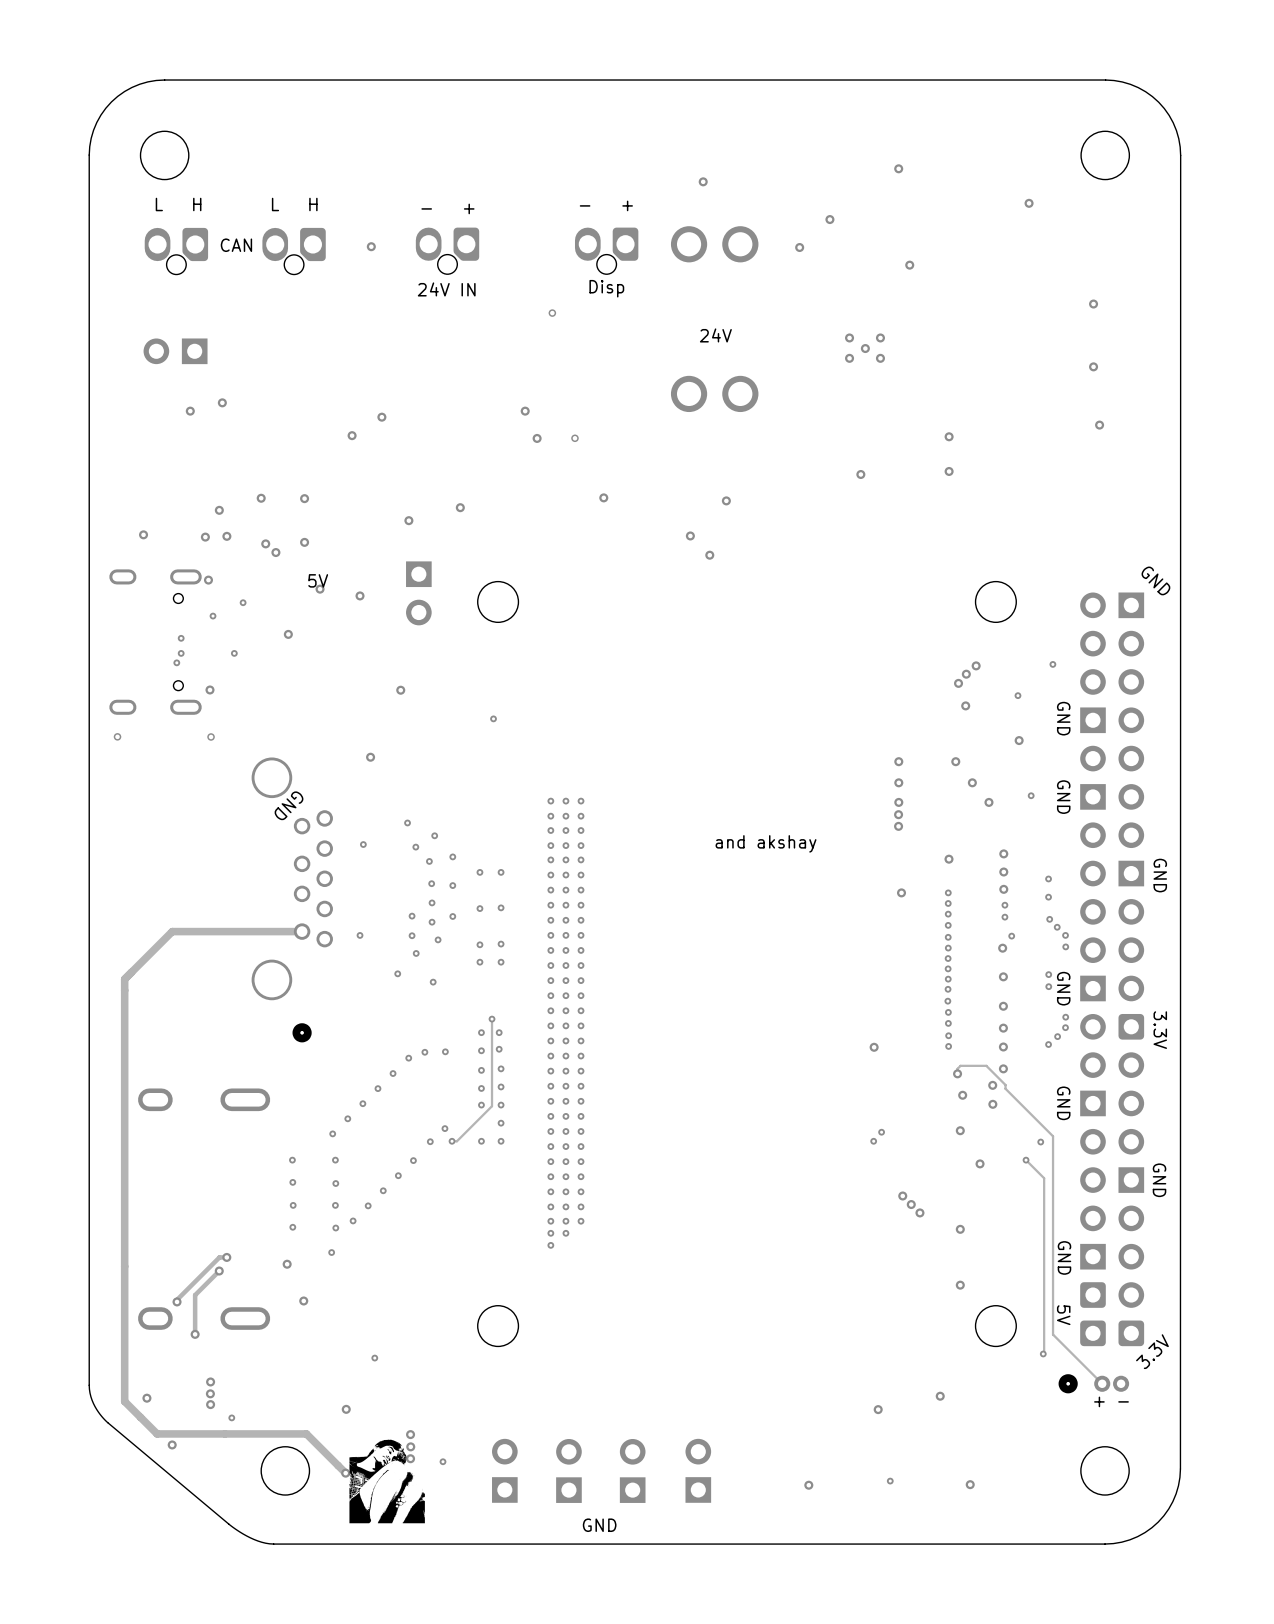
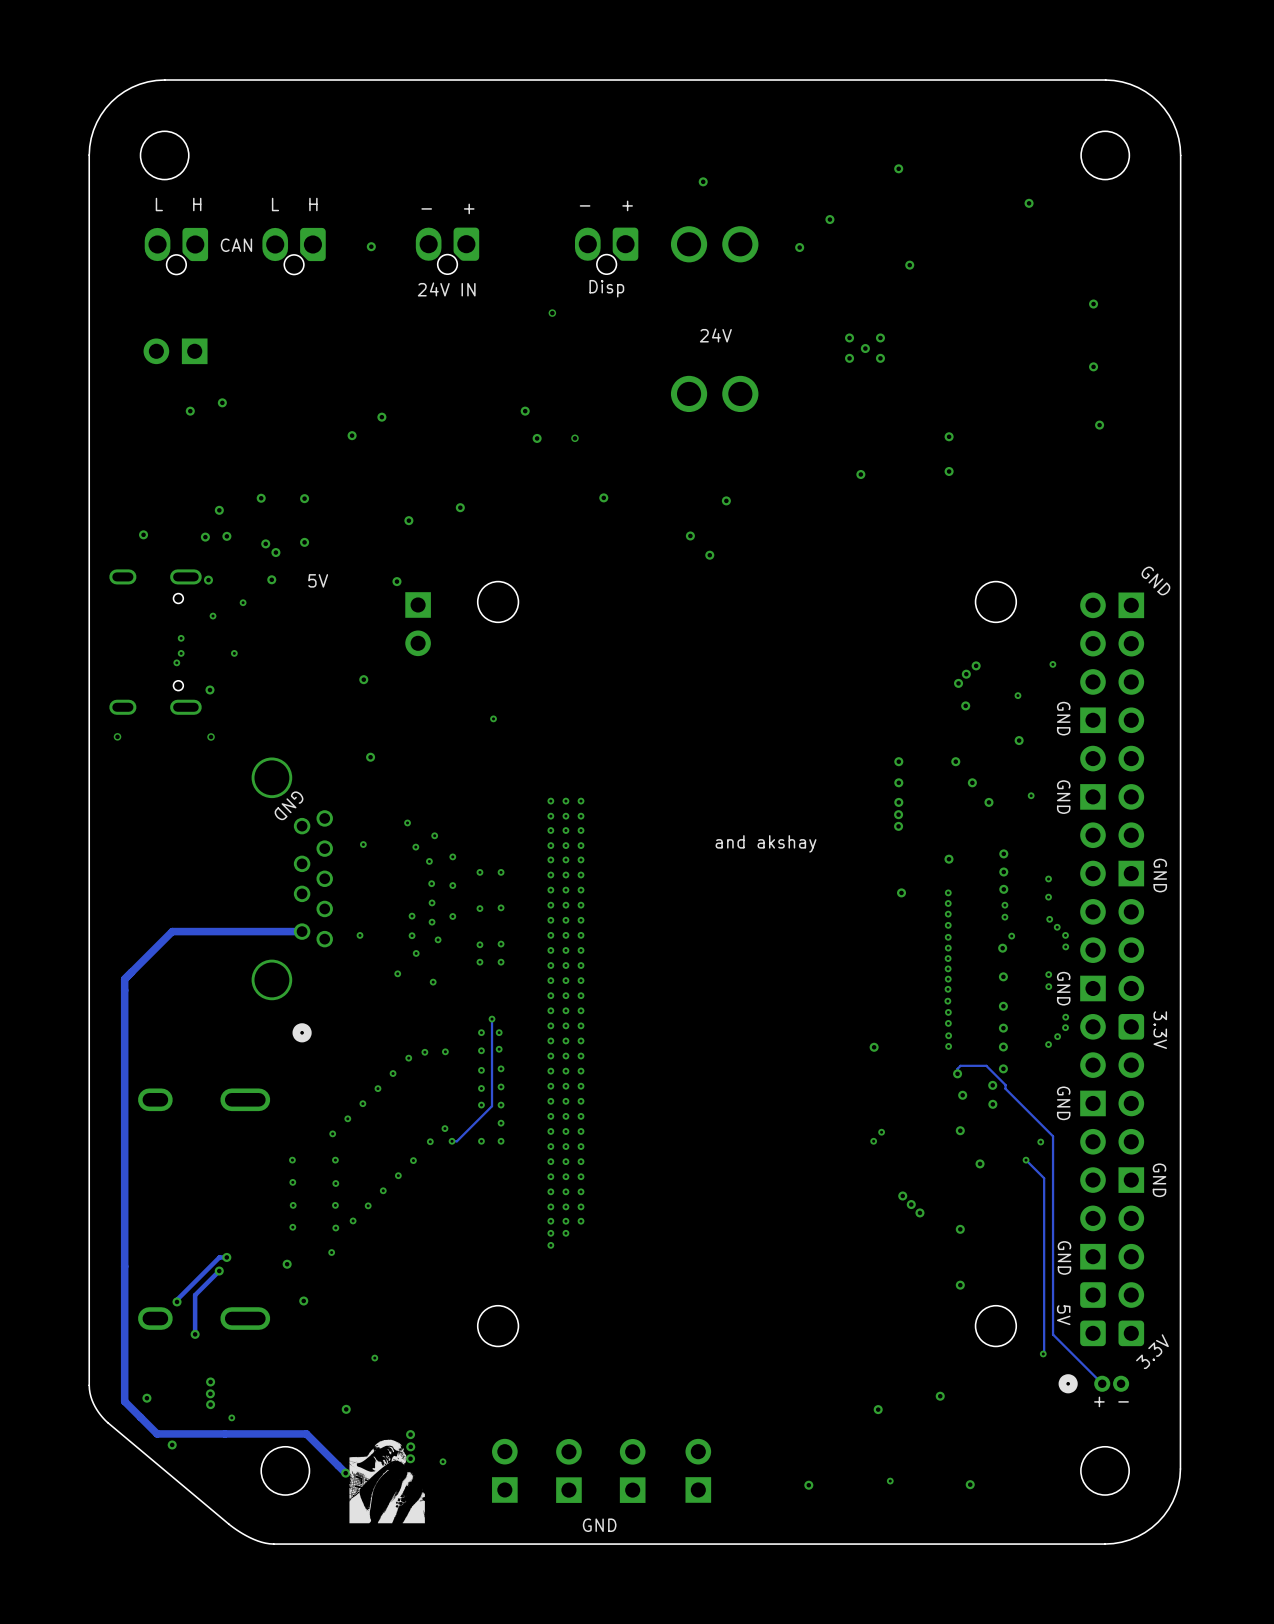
via: none -> (271, 579)
via: none -> (396, 581)
via: (320, 589) -> none
part position: (418, 593) -> (418, 624)
via: (360, 595) -> none
via: (288, 634) -> none
via position: (400, 690) -> (363, 679)

